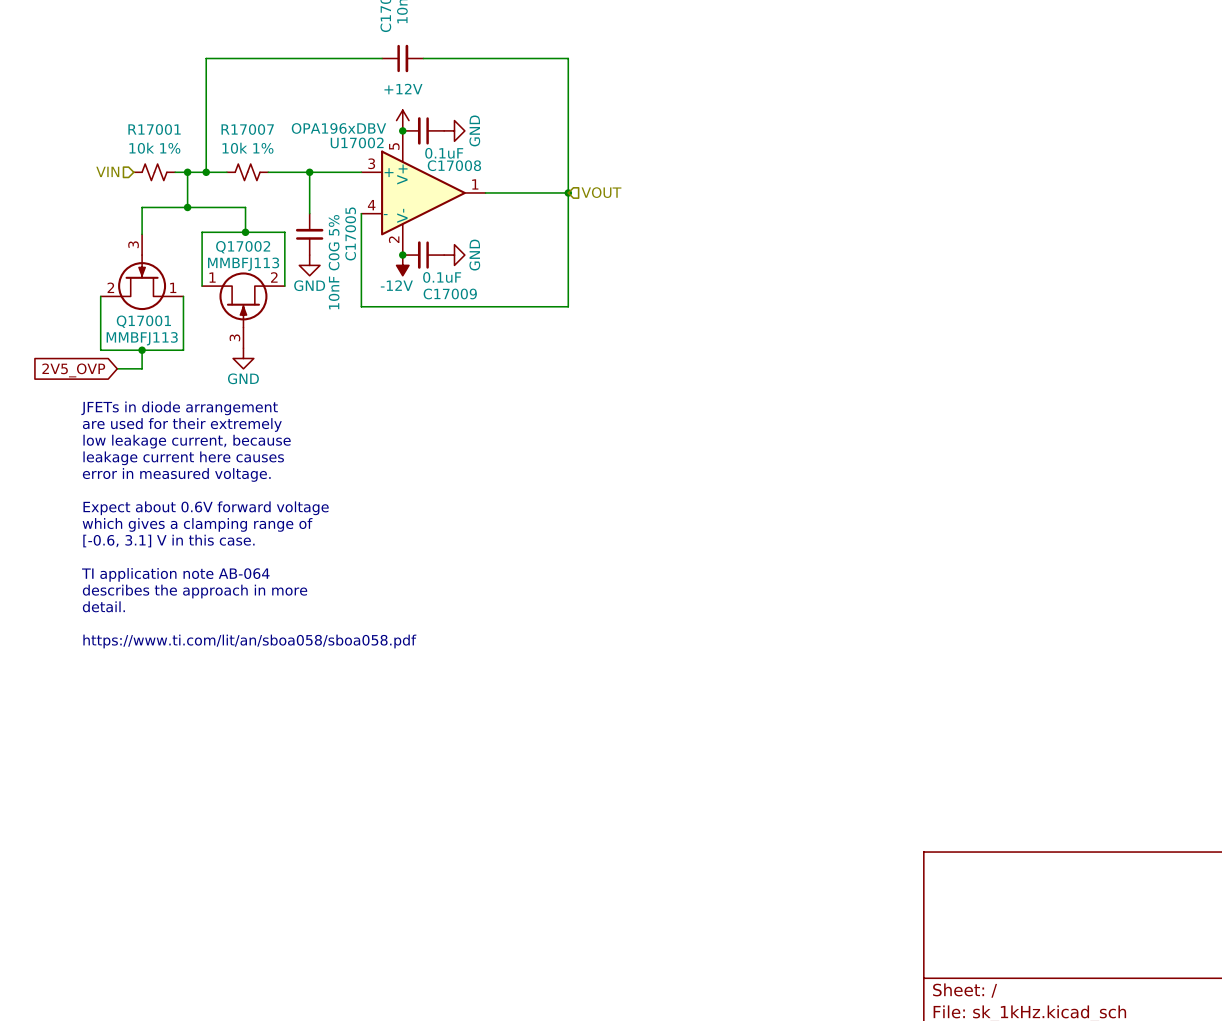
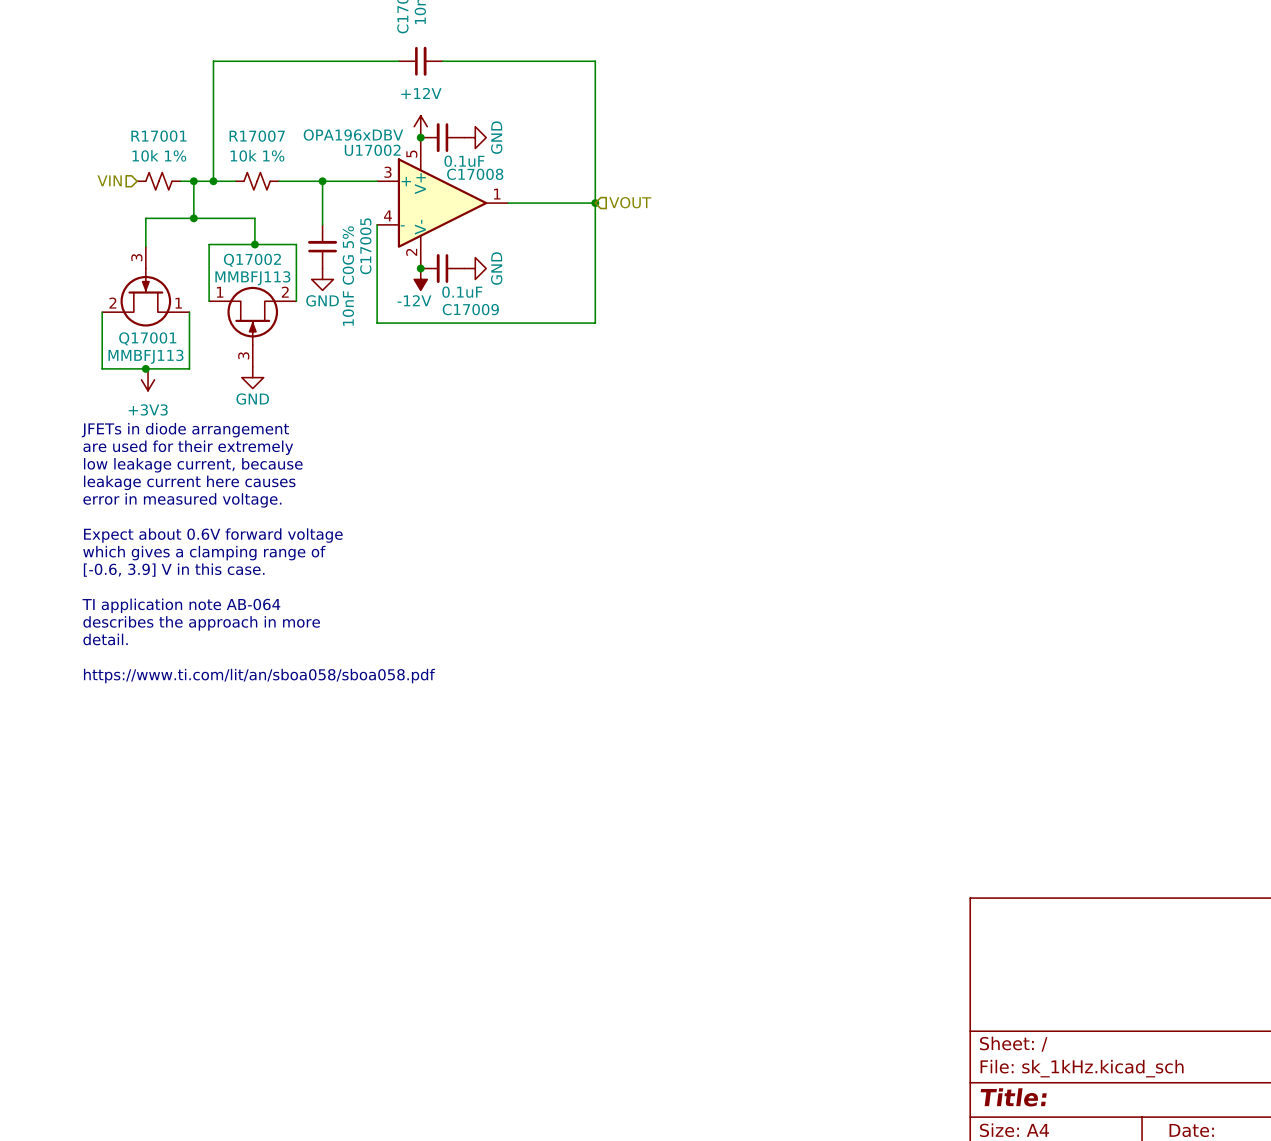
wire: (142, 350) (142, 368) (117, 368) -> none
power symbol: none -> +3V3 (148, 379)
global label: 2V5_OVP (73, 370) -> none
text: [-0.6, 3.1] V in this case. (168, 541) -> [-0.6, 3.9] V in this case. (174, 570)

